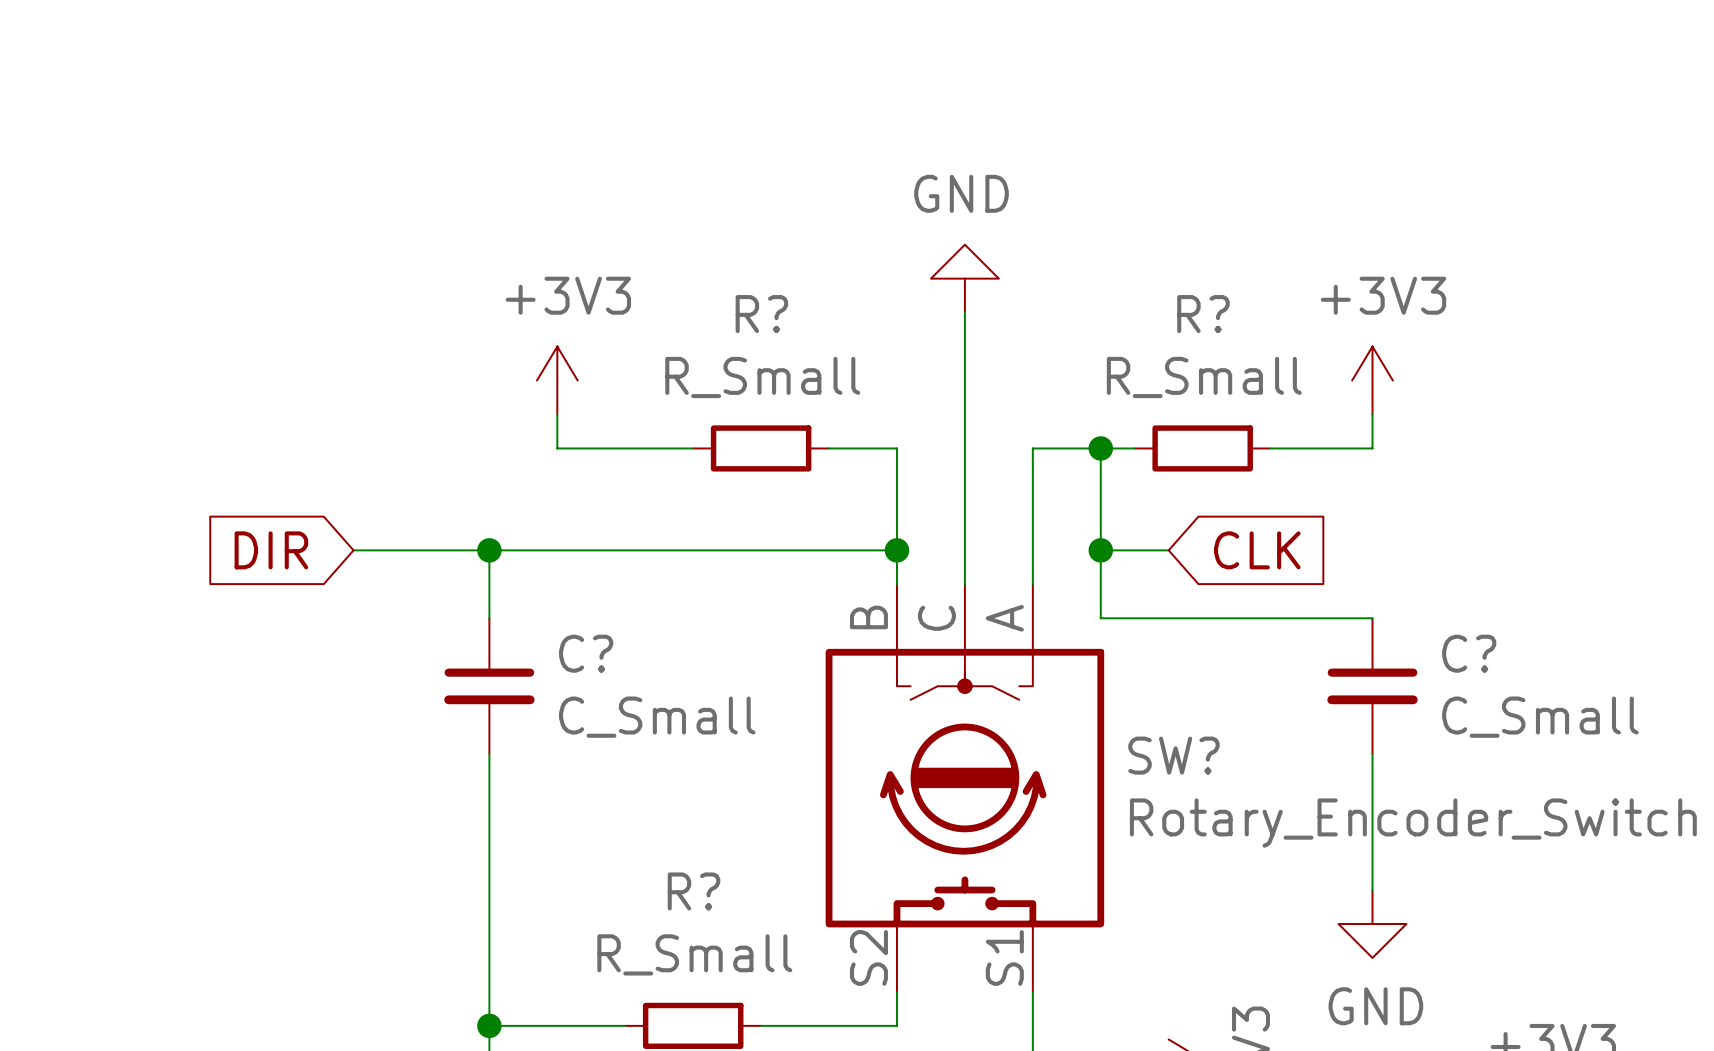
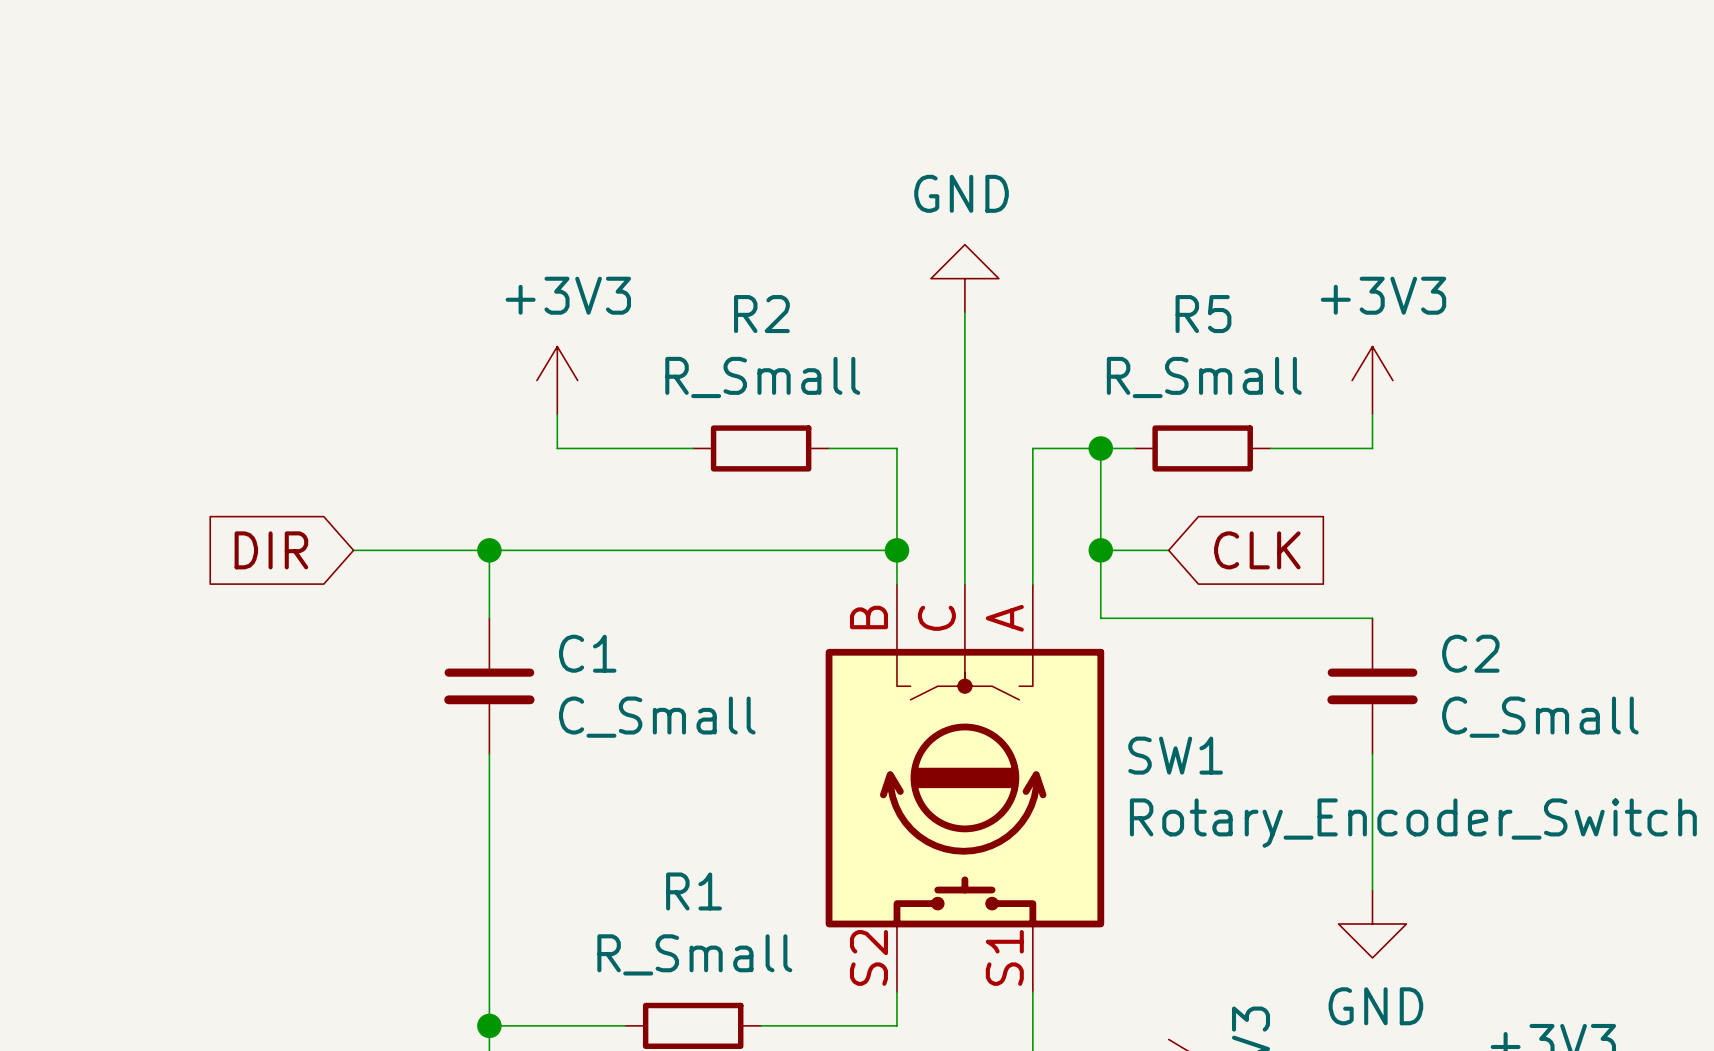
R? name: R? (761, 314) -> R2 (761, 314)
R? name: R? (1203, 314) -> R5 (1203, 314)
C? name: C? (586, 653) -> C1 (587, 653)
C? name: C? (1469, 653) -> C2 (1470, 653)
SW? name: SW? (1173, 755) -> SW1 (1175, 755)
R? name: R? (694, 891) -> R1 (694, 891)

